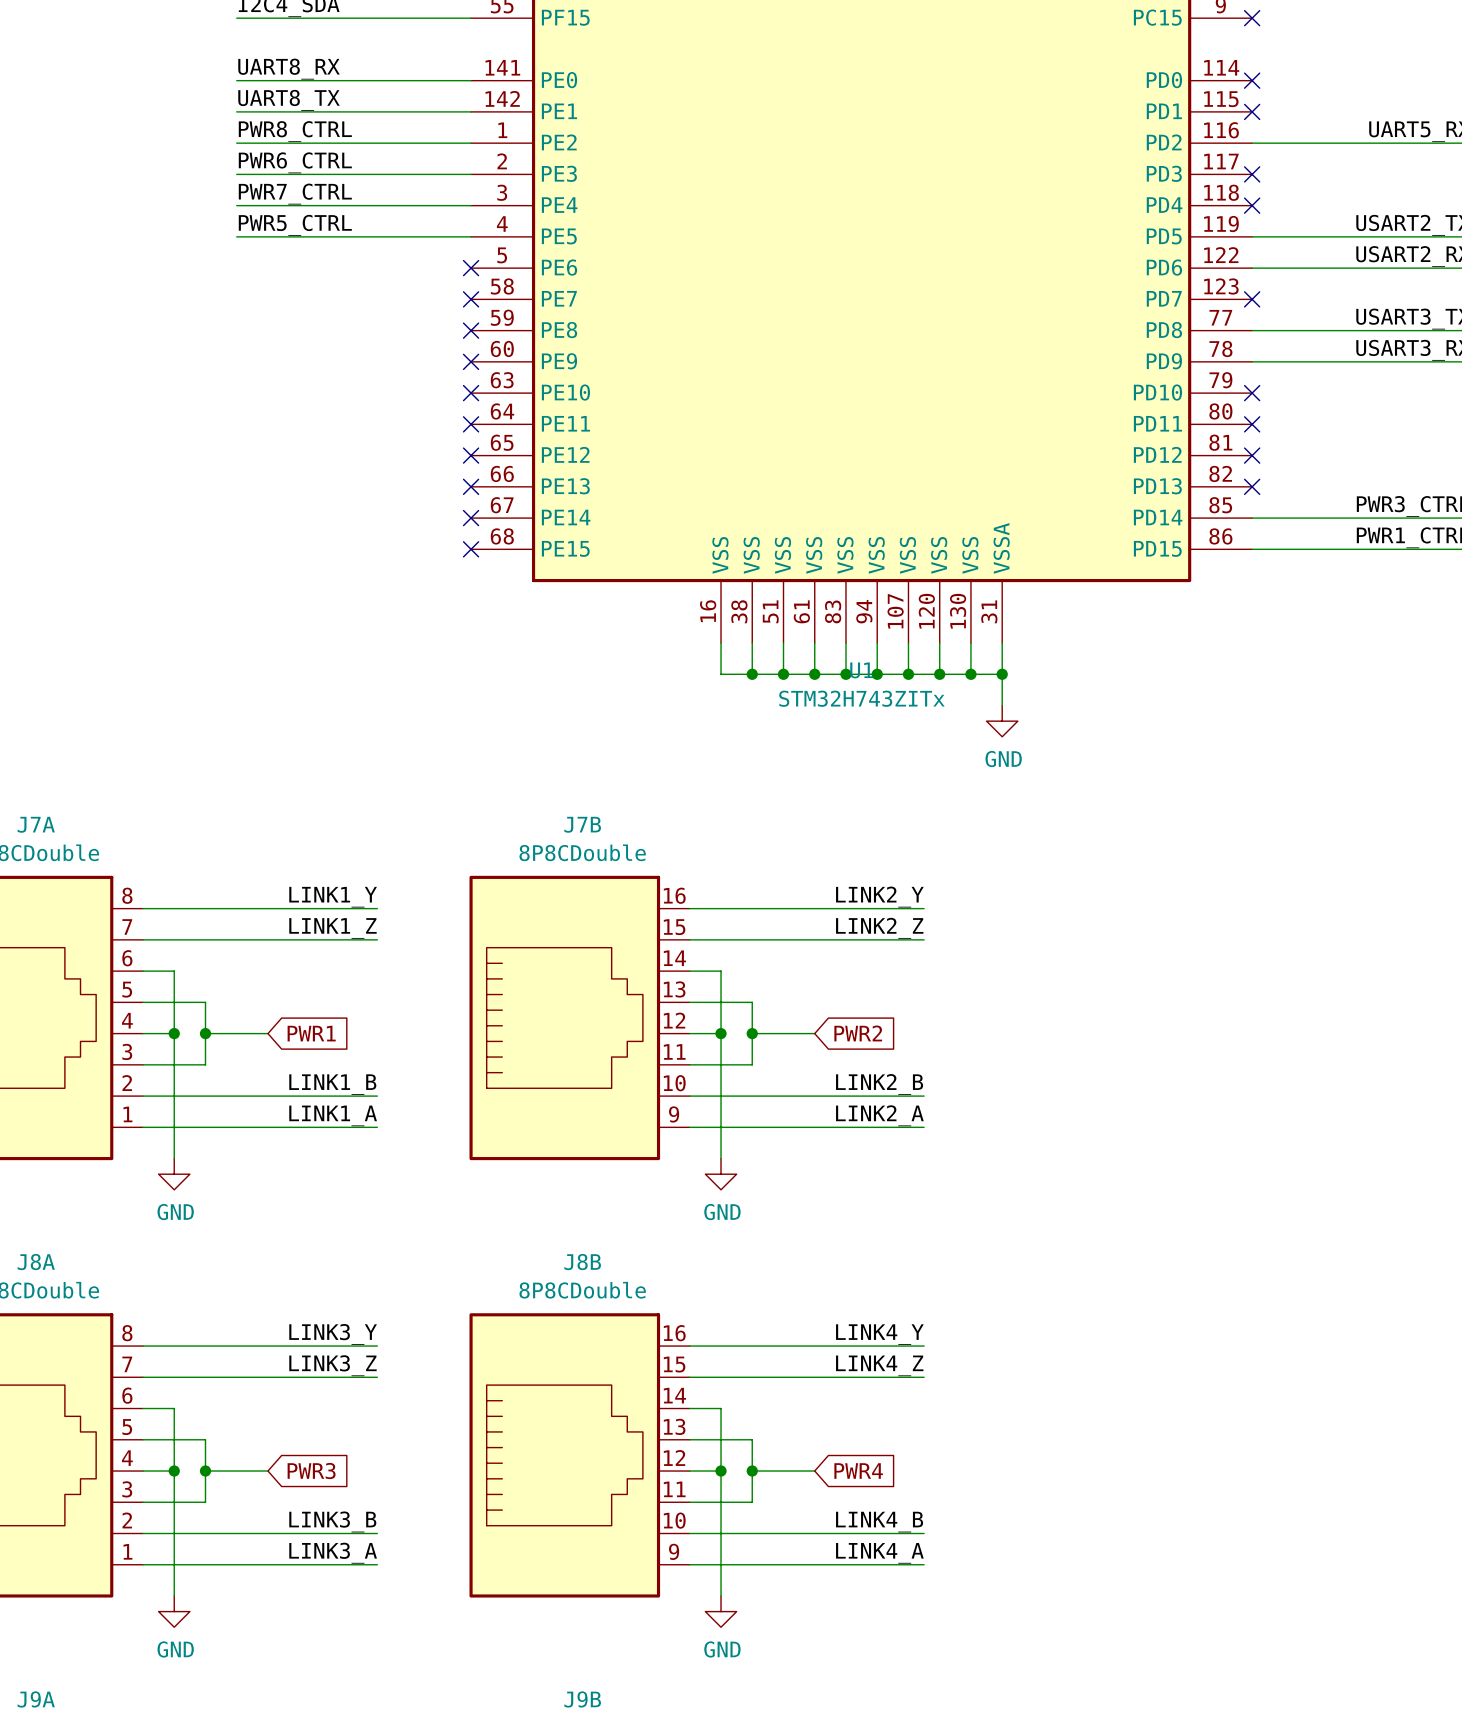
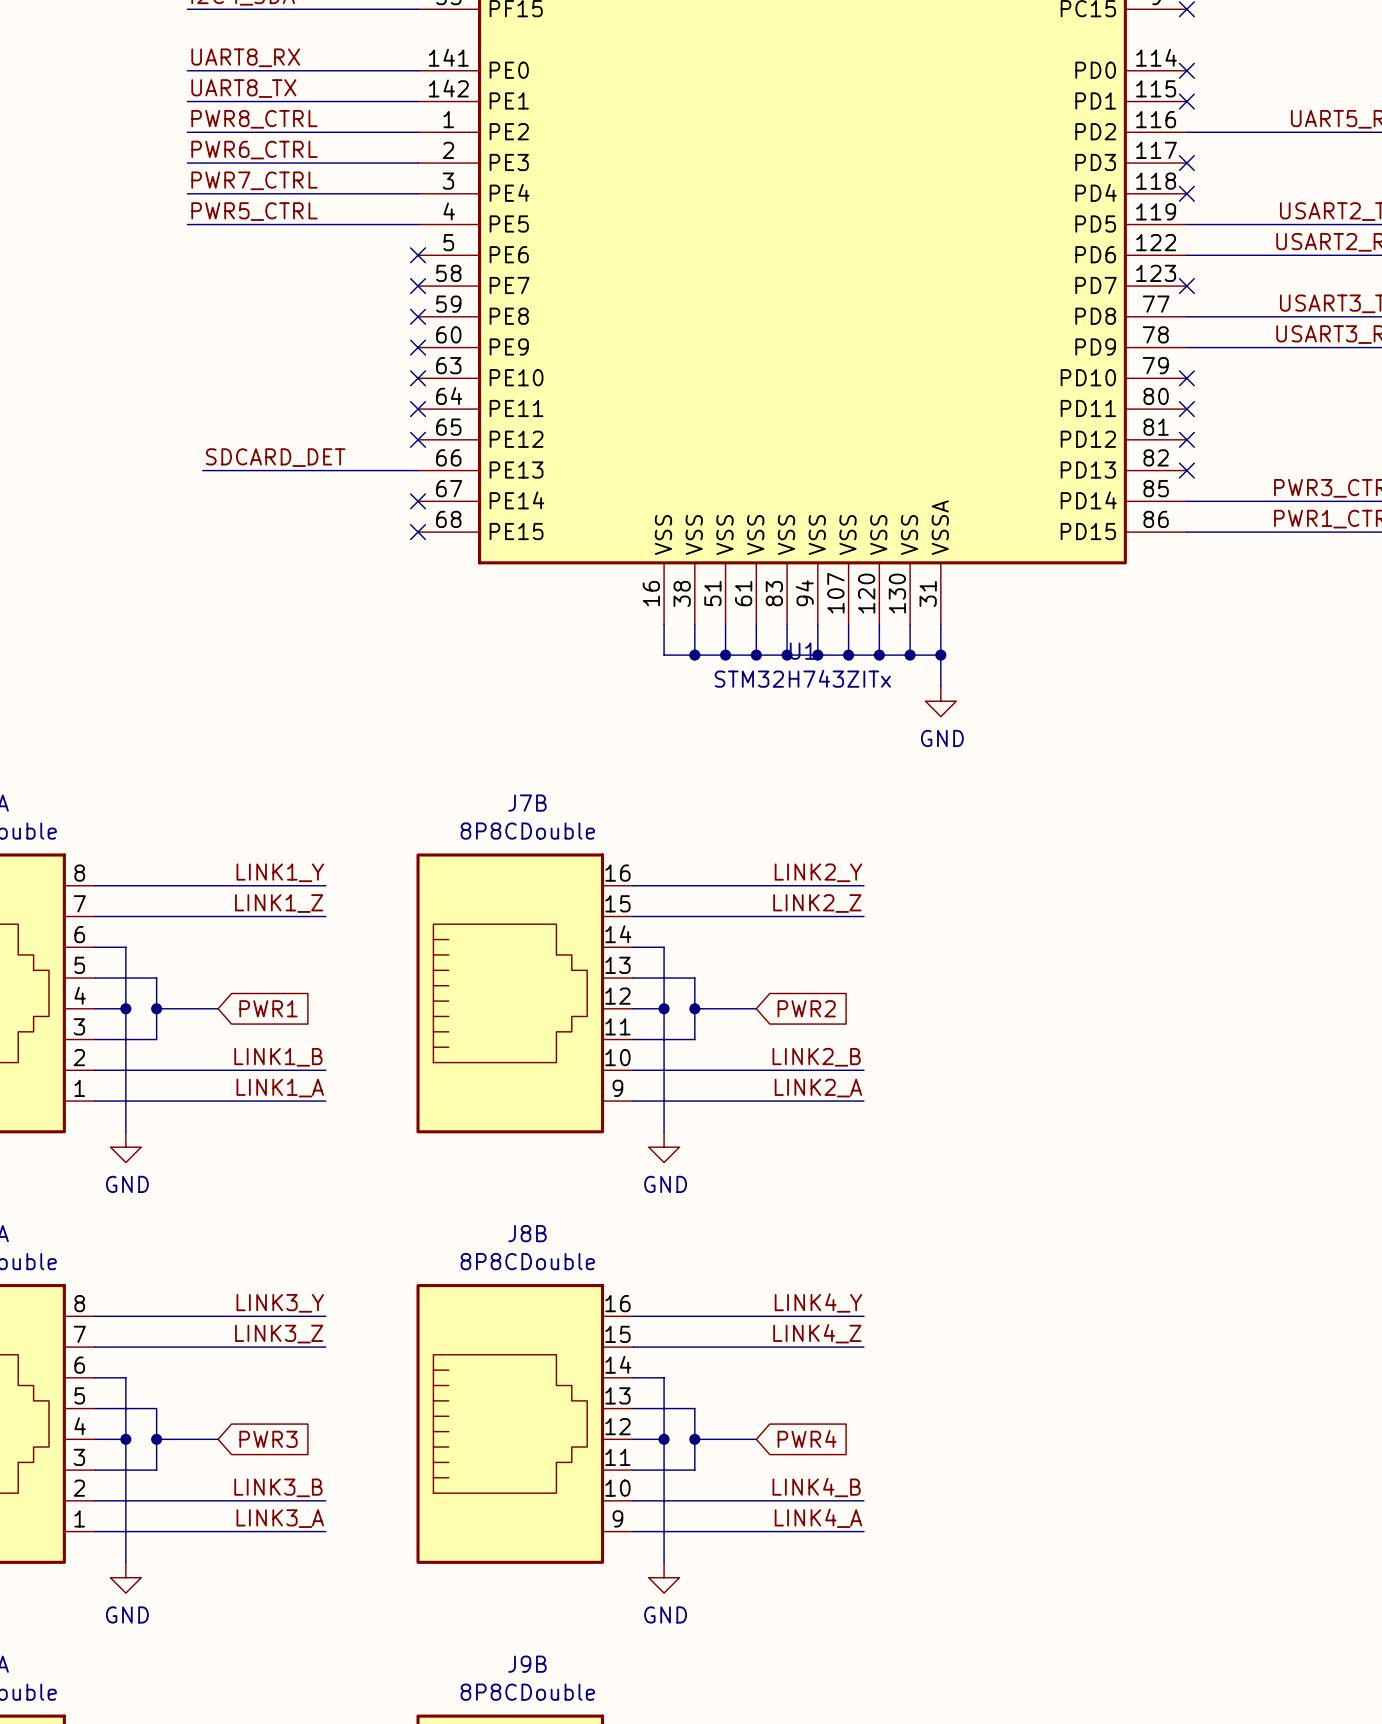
label: none -> SDCARD_DET (275, 457)
wire: none -> (202, 470) (418, 470)
no-connect mark: (471, 486) -> none

